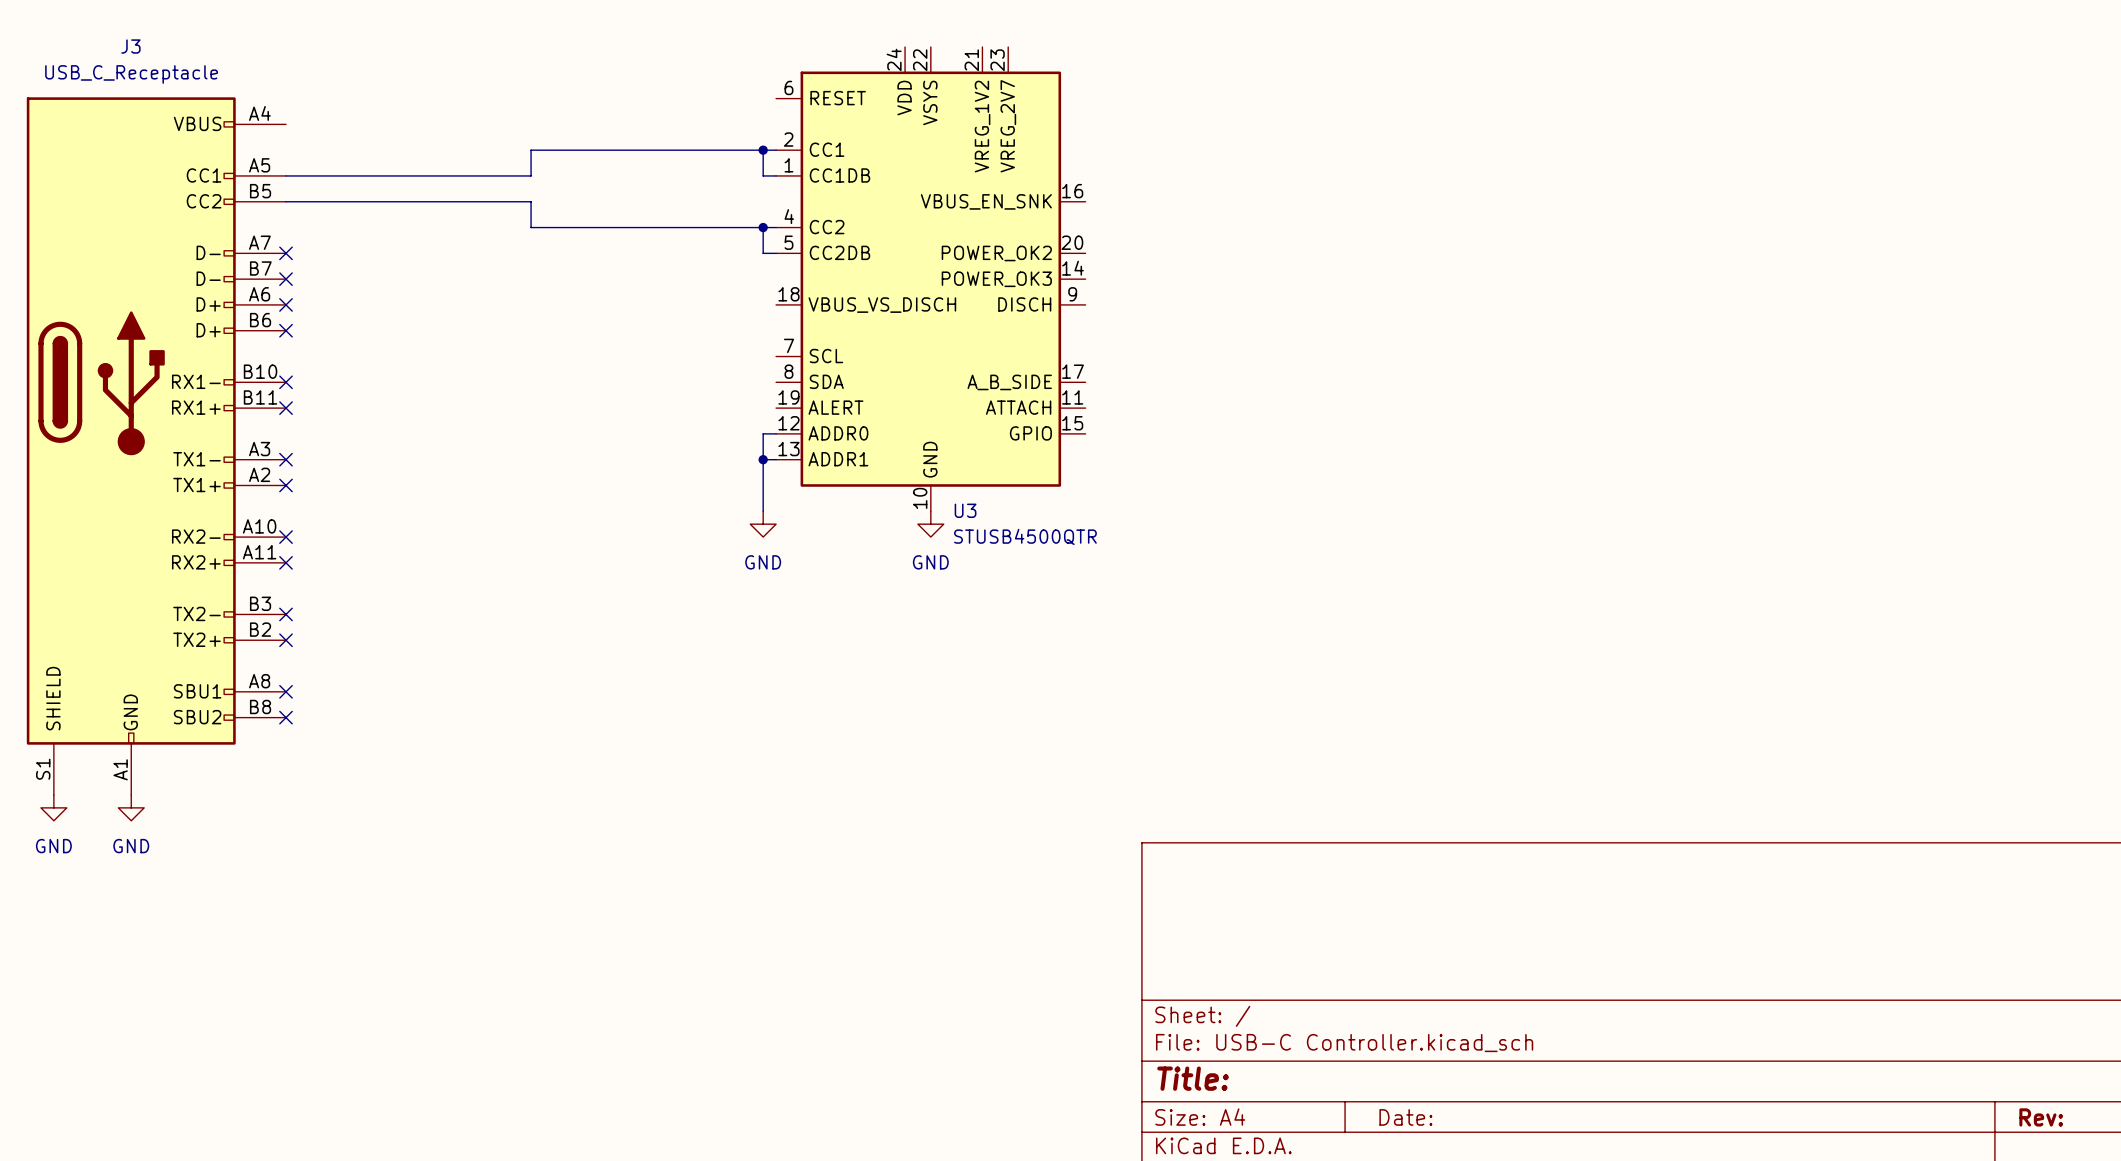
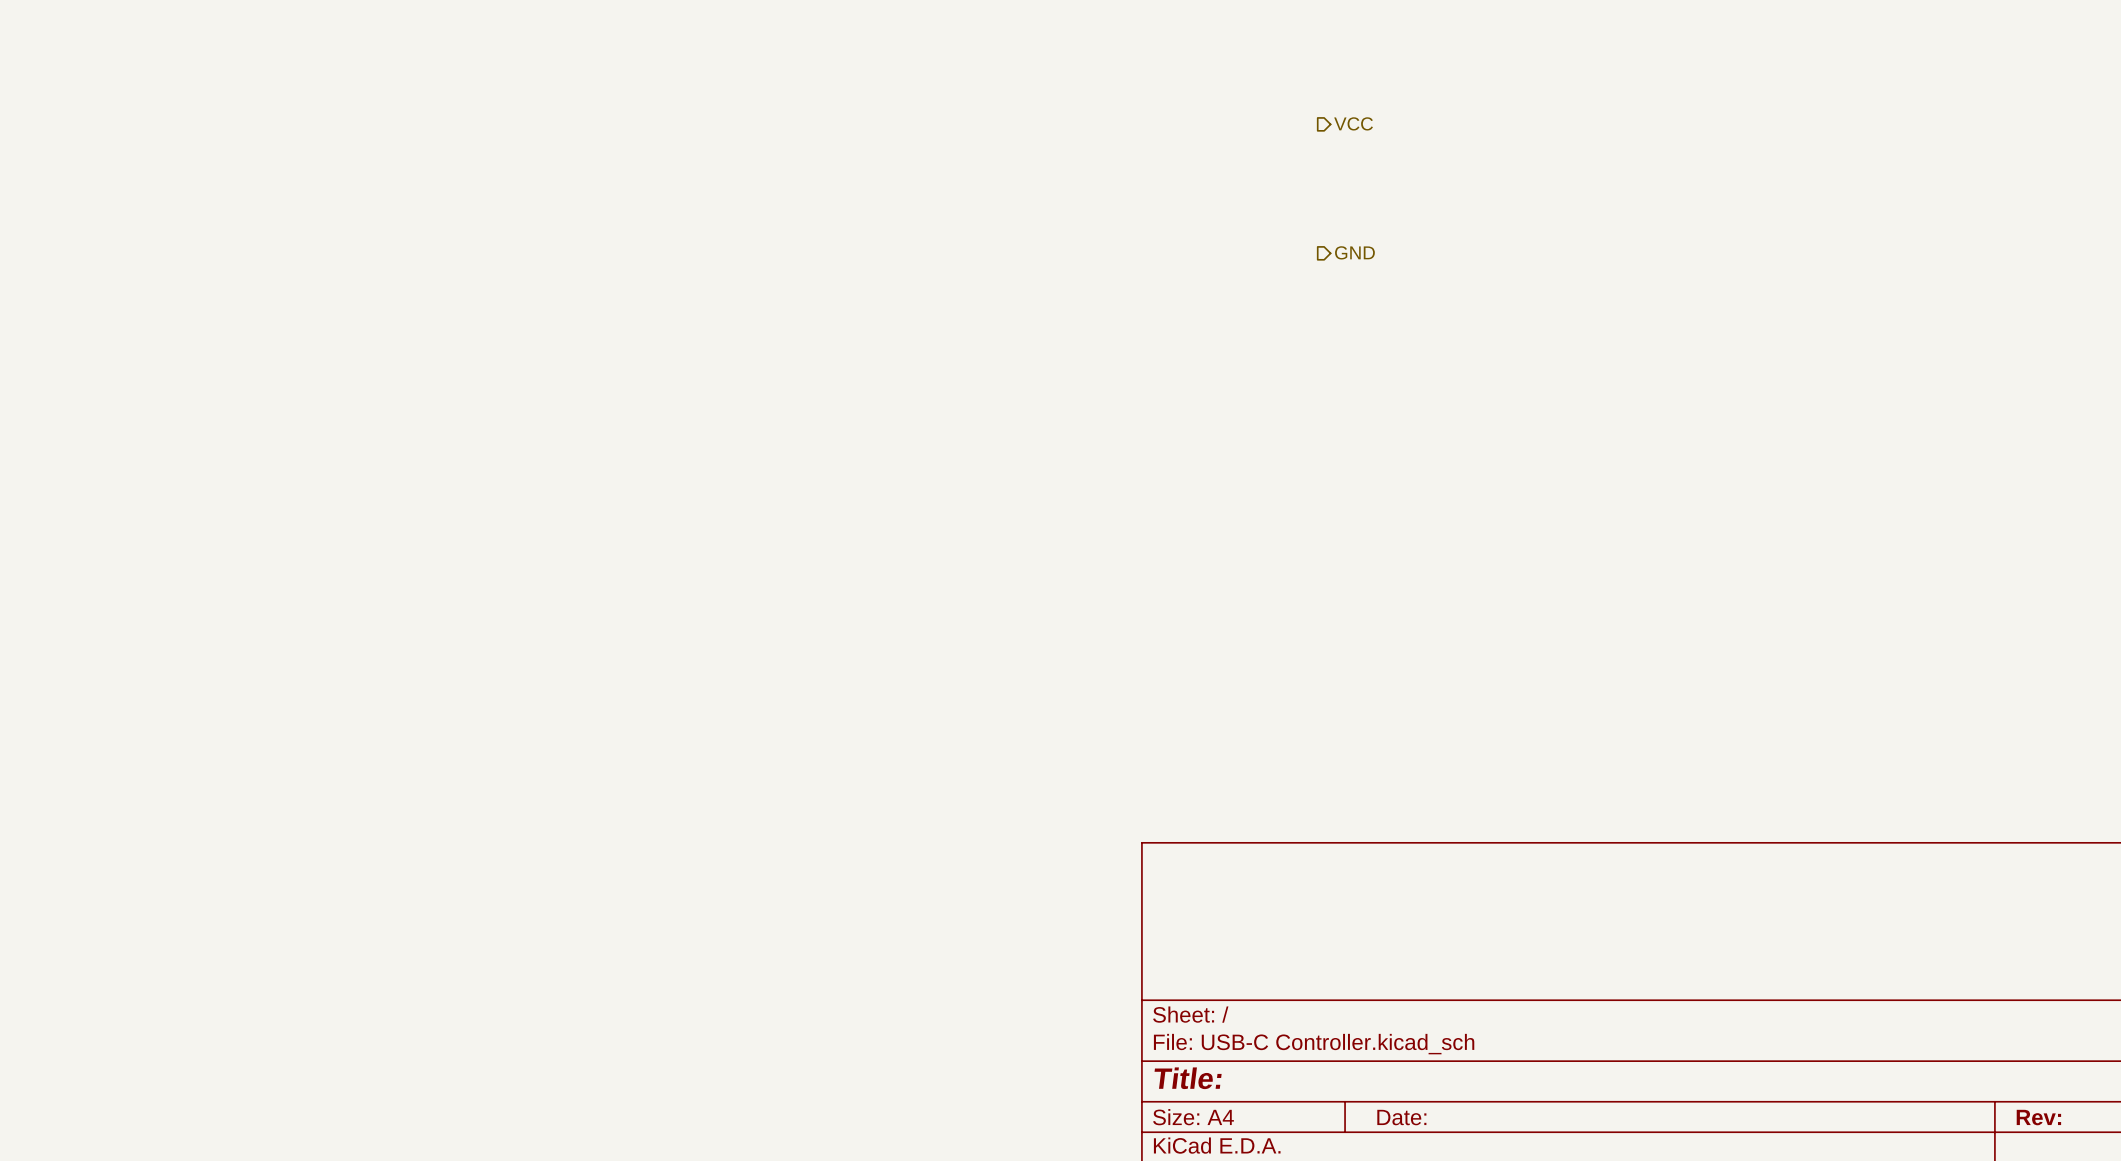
hierarchical label: none -> VCC (1353, 123)
wire: (763, 150) (763, 175) (776, 175) -> none
junction: (763, 150) -> none
wire: (776, 150) (531, 150) (531, 175) (286, 175) -> none
wire: (286, 201) (531, 201) (531, 227) (776, 227) -> none
wire: (763, 227) (763, 253) (776, 253) -> none
junction: (763, 227) -> none
hierarchical label: none -> GND (1354, 252)
no-connect mark: (286, 253) -> none
no-connect mark: (286, 279) -> none
U3: STUSB4500QTR (930, 279) -> none
no-connect mark: (286, 304) -> none
no-connect mark: (286, 330) -> none
no-connect mark: (286, 382) -> none
no-connect mark: (286, 408) -> none
wire: (776, 433) (763, 433) (763, 511) -> none
J3: USB_C_Receptacle (156, 446) -> none
no-connect mark: (286, 459) -> none
wire: (763, 459) (776, 459) -> none
junction: (763, 459) -> none
no-connect mark: (286, 485) -> none
power symbol: GND (763, 524) -> none
power symbol: GND (930, 524) -> none
no-connect mark: (286, 537) -> none
no-connect mark: (286, 562) -> none
no-connect mark: (286, 614) -> none
no-connect mark: (286, 640) -> none
no-connect mark: (286, 691) -> none
no-connect mark: (286, 717) -> none
power symbol: GND (53, 807) -> none
power symbol: GND (131, 807) -> none

